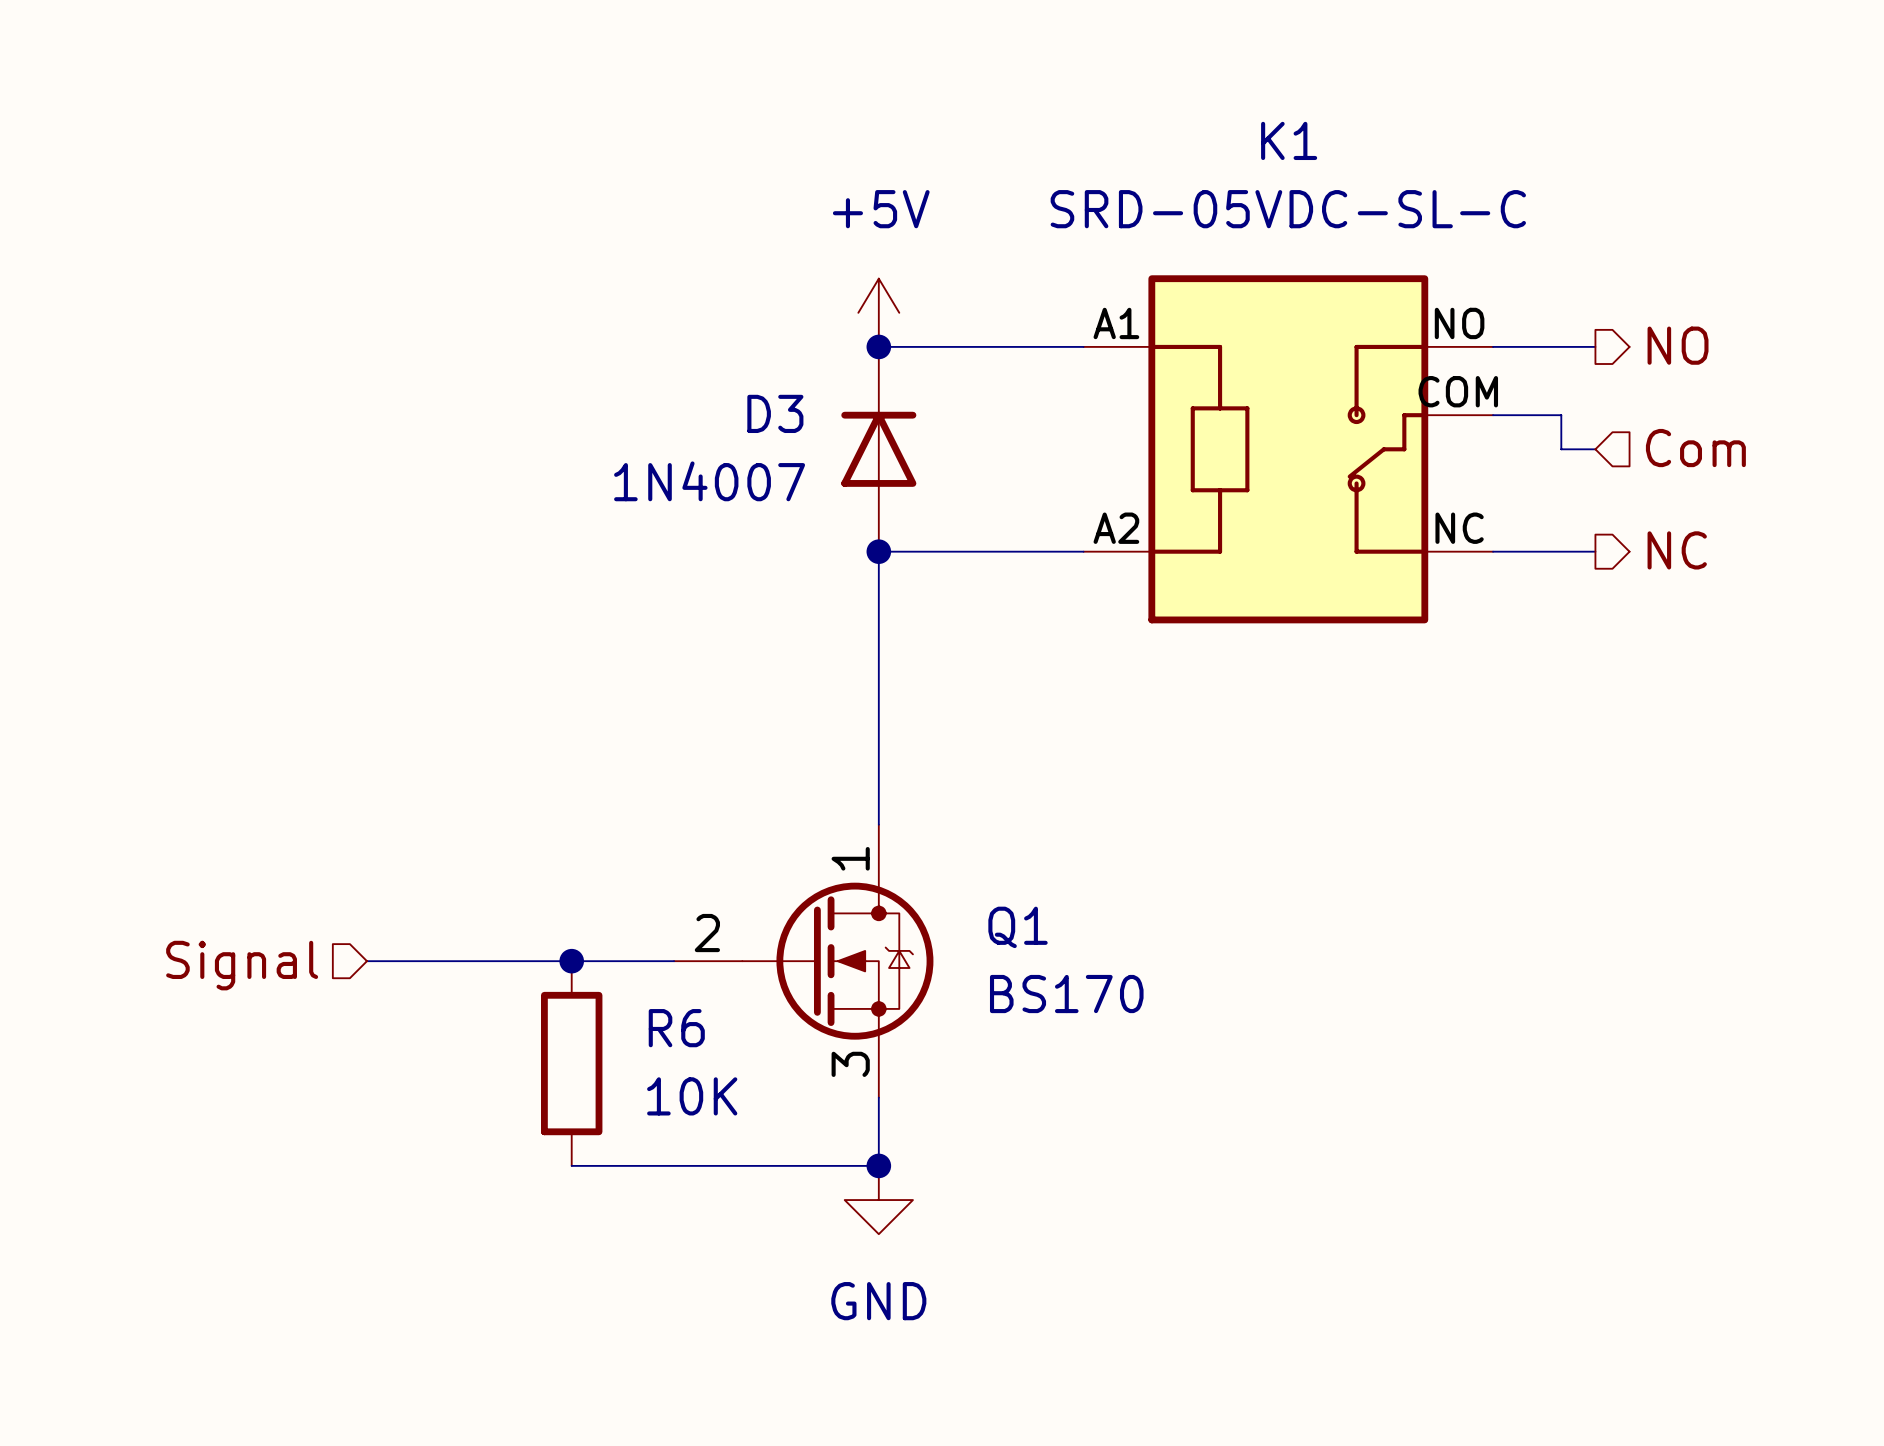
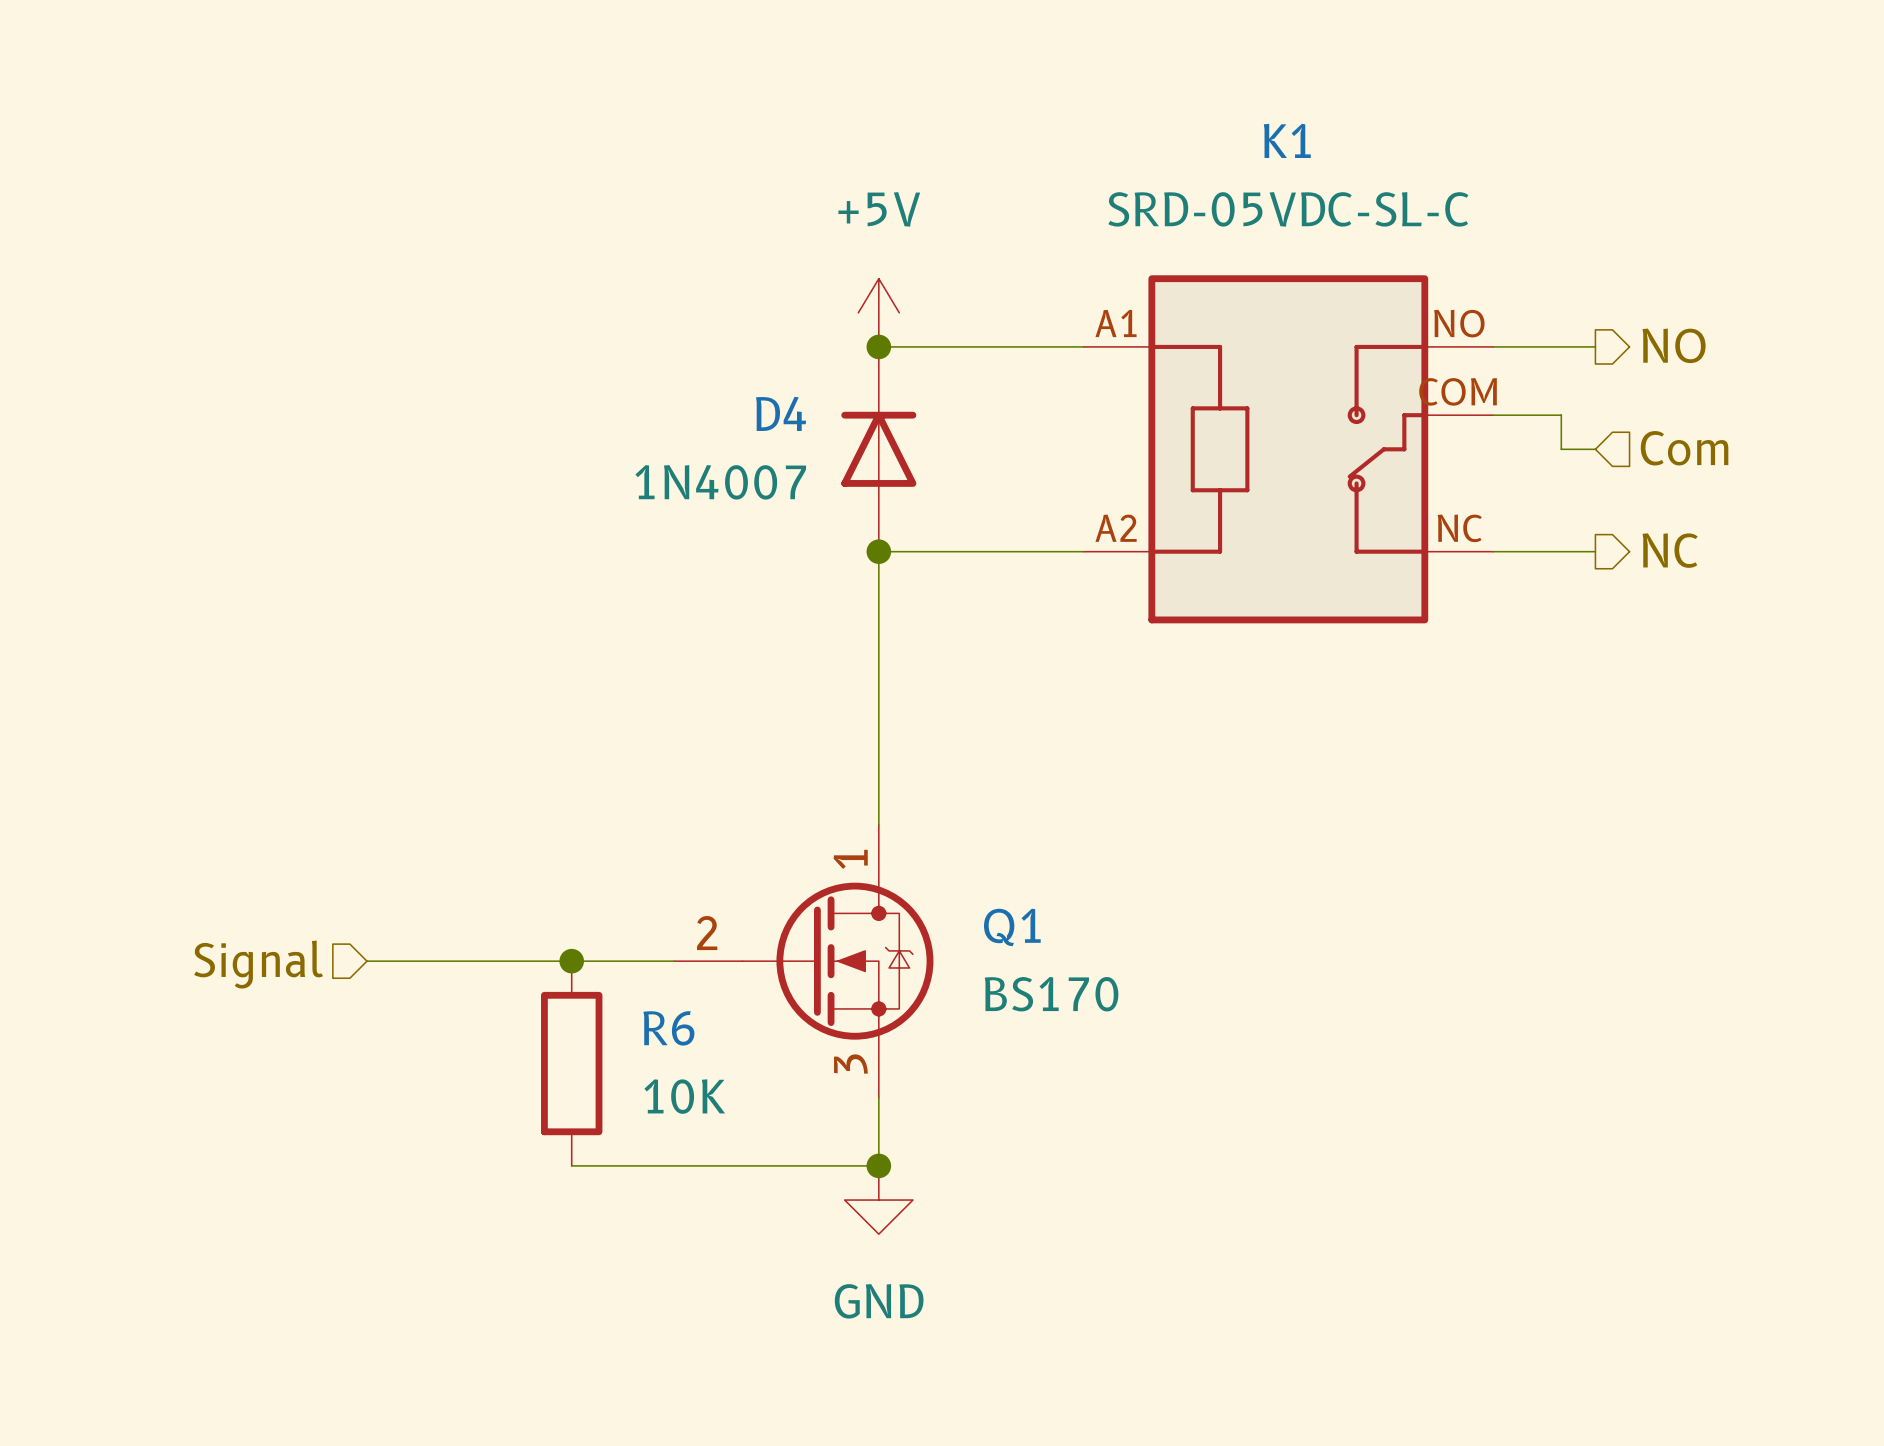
D3 name: D3 (775, 413) -> D4 (781, 413)

